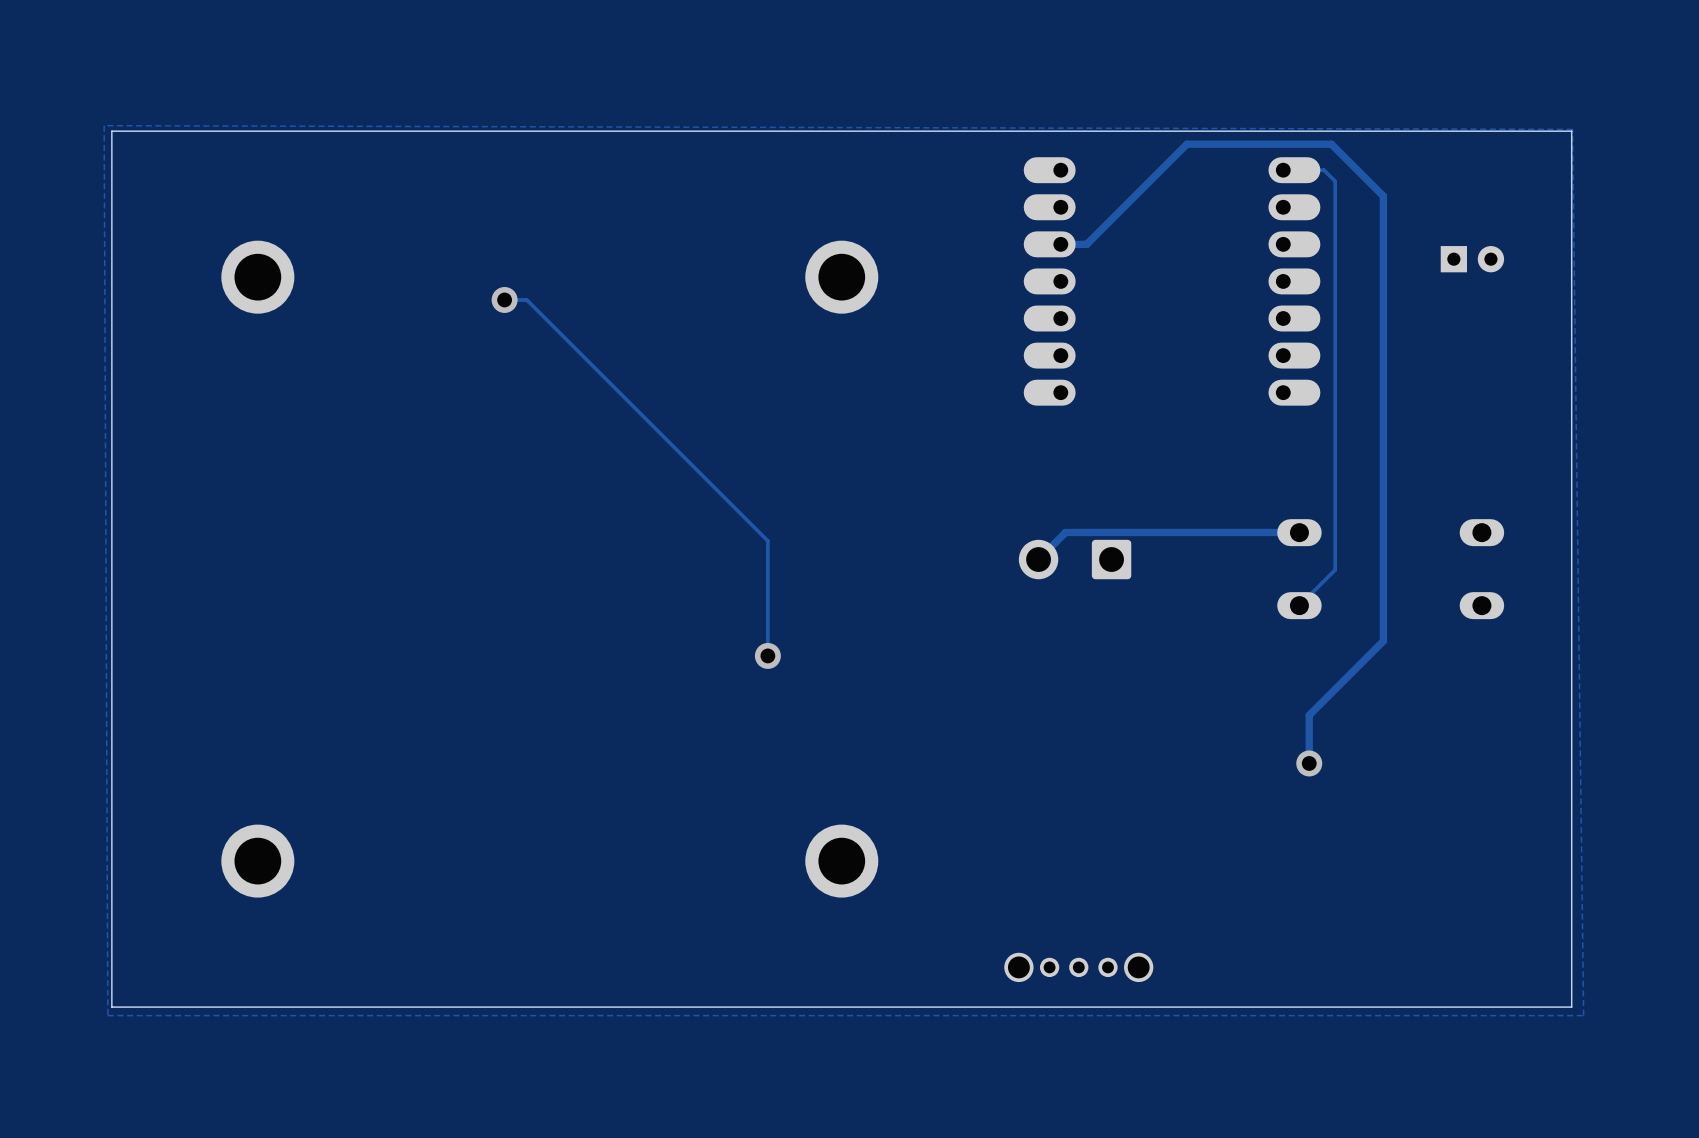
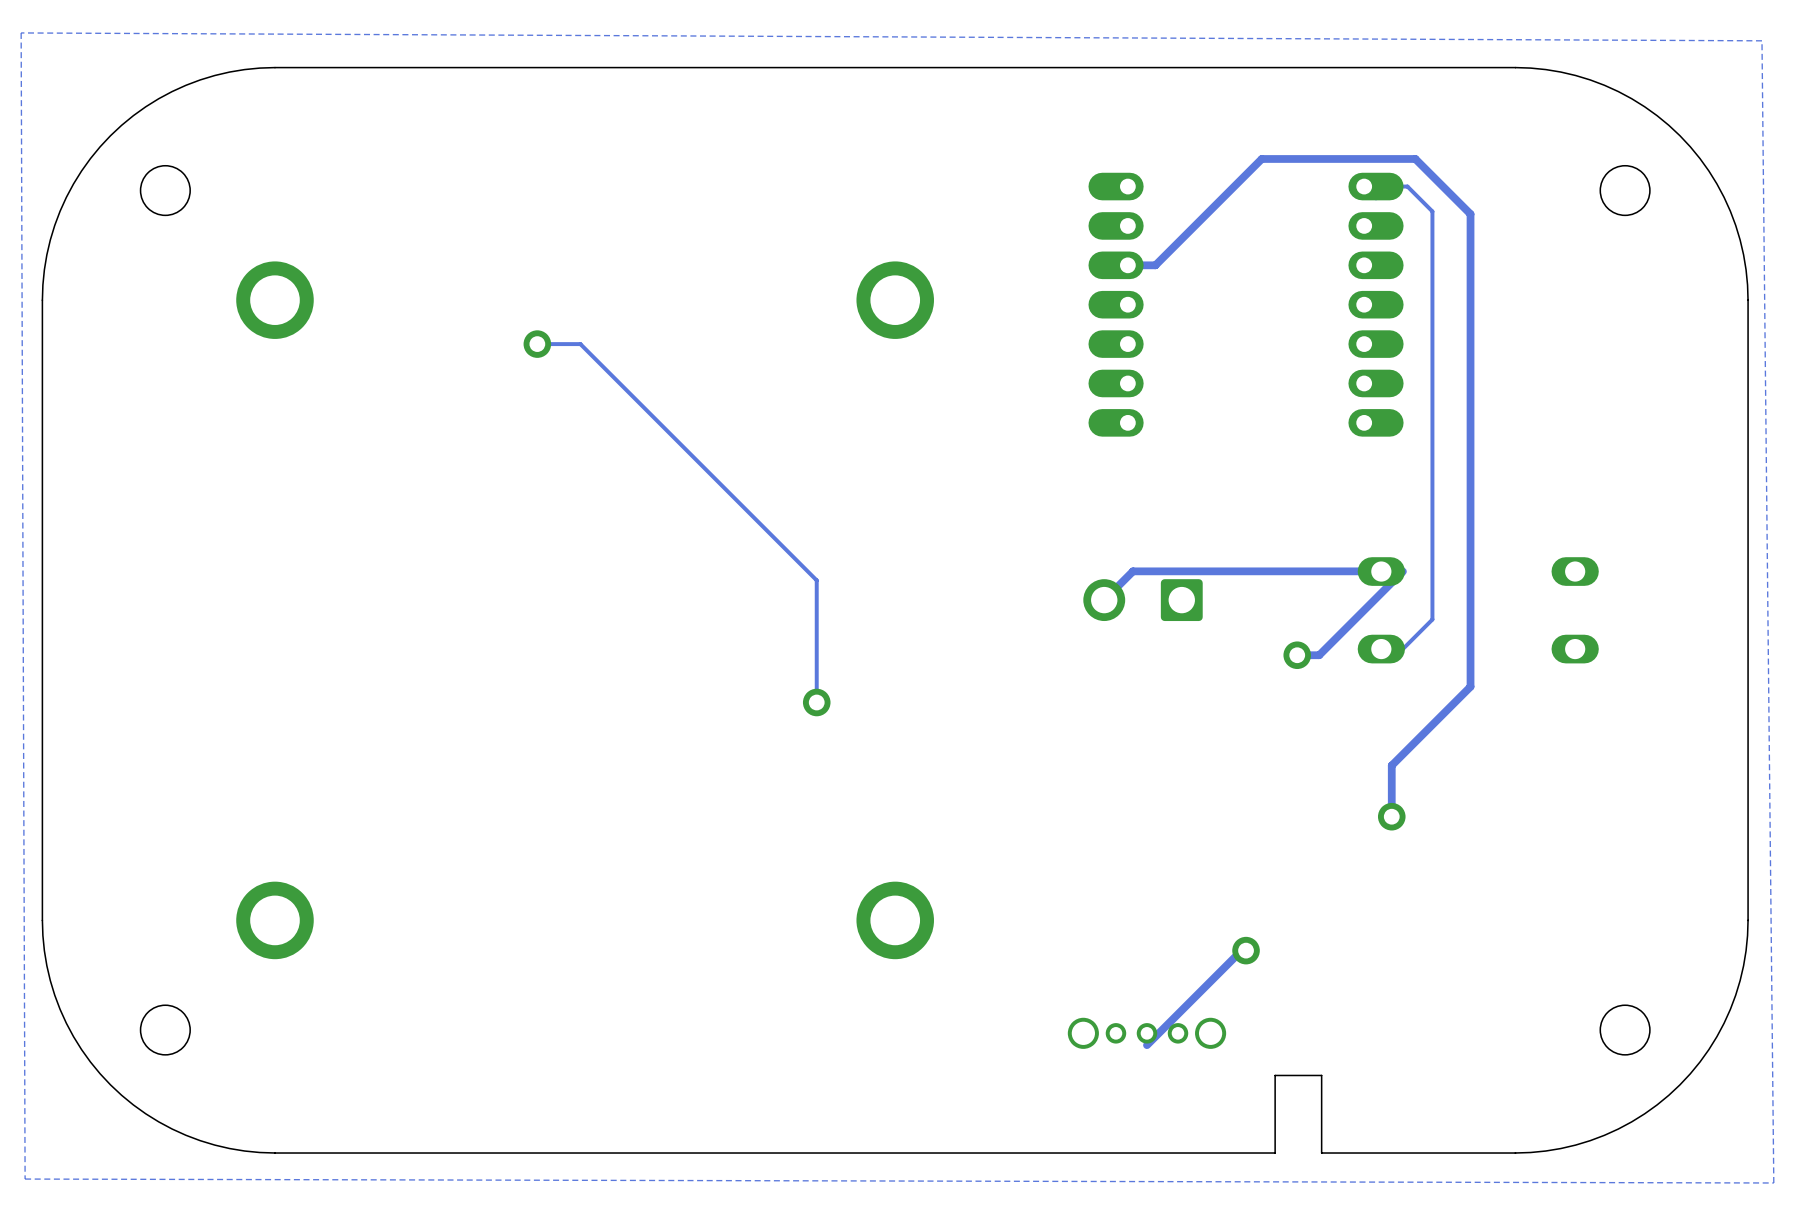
zone outline: (104, 125) (1572, 129) (1583, 1015) (107, 1015) (104, 125) -> (21, 32) (1761, 40) (1773, 1182) (25, 1179) (21, 32)
round board edge: none -> [139, 164, 191, 217]
round board edge: none -> [1599, 164, 1651, 217]
track: (1335, 181) (1335, 569) (1299, 605) -> (1419, 198) (1432, 211) (1432, 619) (1402, 649)
part: (1472, 259) -> none
track: (504, 299) (526, 299) (545, 318) -> (537, 344) (580, 344)
via position: (504, 299) -> (537, 344)
track: none -> (1402, 571) (1319, 655) (1297, 655)
via: none -> (1297, 655)
track: none -> (1246, 950) (1241, 950) (1146, 1045)
via: none -> (1246, 950)
round board edge: none -> [139, 1004, 191, 1056]
round board edge: none -> [1599, 1004, 1651, 1056]
board edge: (1243, 1007) (1571, 1007) (1571, 131) (111, 131) (111, 1007) (1199, 1007) -> (1321, 1075) (1321, 1153) (1515, 1153) (1560, 1148) (1590, 1140) (1618, 1129) (1644, 1113) (1668, 1095) (1690, 1073) (1708, 1049) (1724, 1023) (1735, 995) (1746, 950) (1748, 920) (1747, 284) (1740, 239) (1724, 197) (1699, 158) (1679, 135) (1657, 115) (1618, 91) (1590, 79) (1560, 72) (1530, 68) (274, 67) (244, 69) (214, 75) (172, 91) (145, 106) (121, 125) (90, 158) (73, 183) (54, 225) (46, 254) (42, 284) (42, 935) (50, 980) (66, 1023) (81, 1049) (100, 1073) (133, 1104) (158, 1121) (200, 1140) (229, 1148) (259, 1152) (1275, 1153) (1275, 1075)

